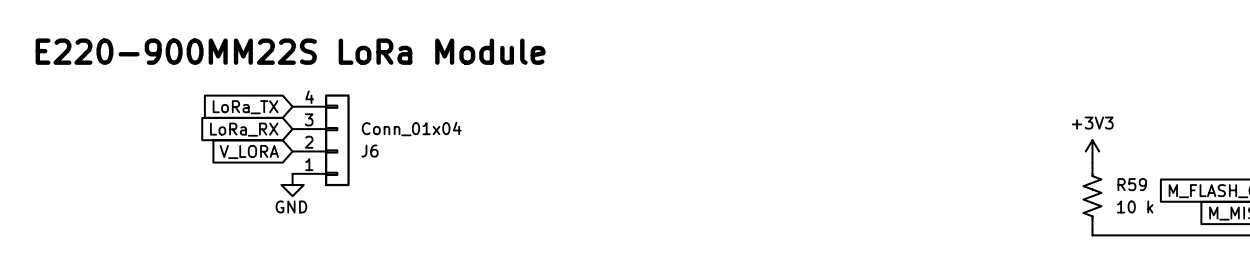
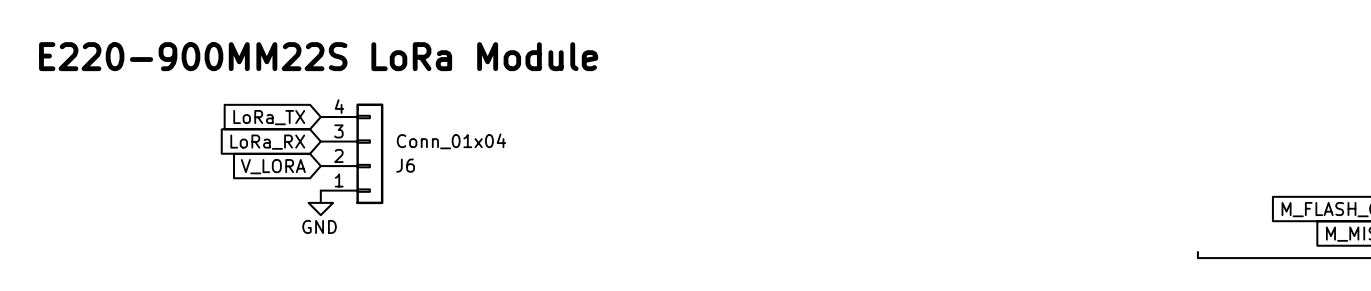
power symbol: +3V3 (1092, 151) -> none
R59: 10 k (1092, 196) -> none

